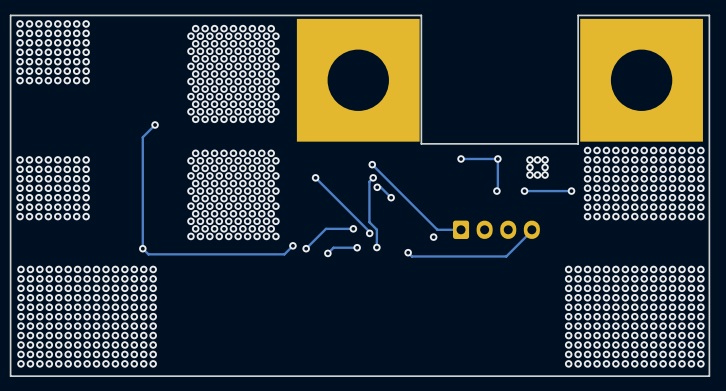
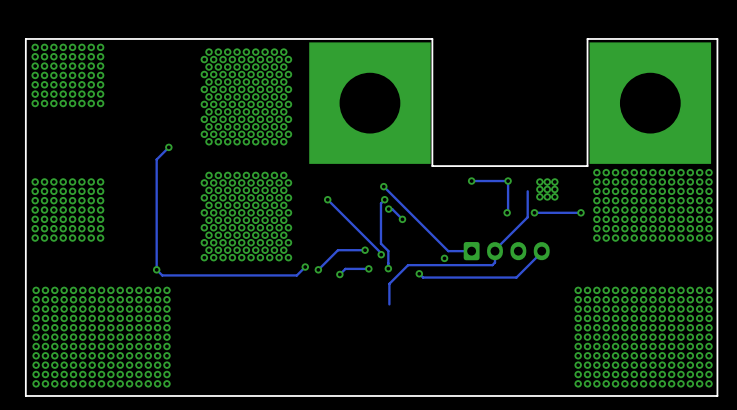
via: none -> (547, 189)
track: none -> (527, 191) (527, 217) (495, 249) (495, 262) (492, 265) (408, 265) (389, 283) (389, 304)

